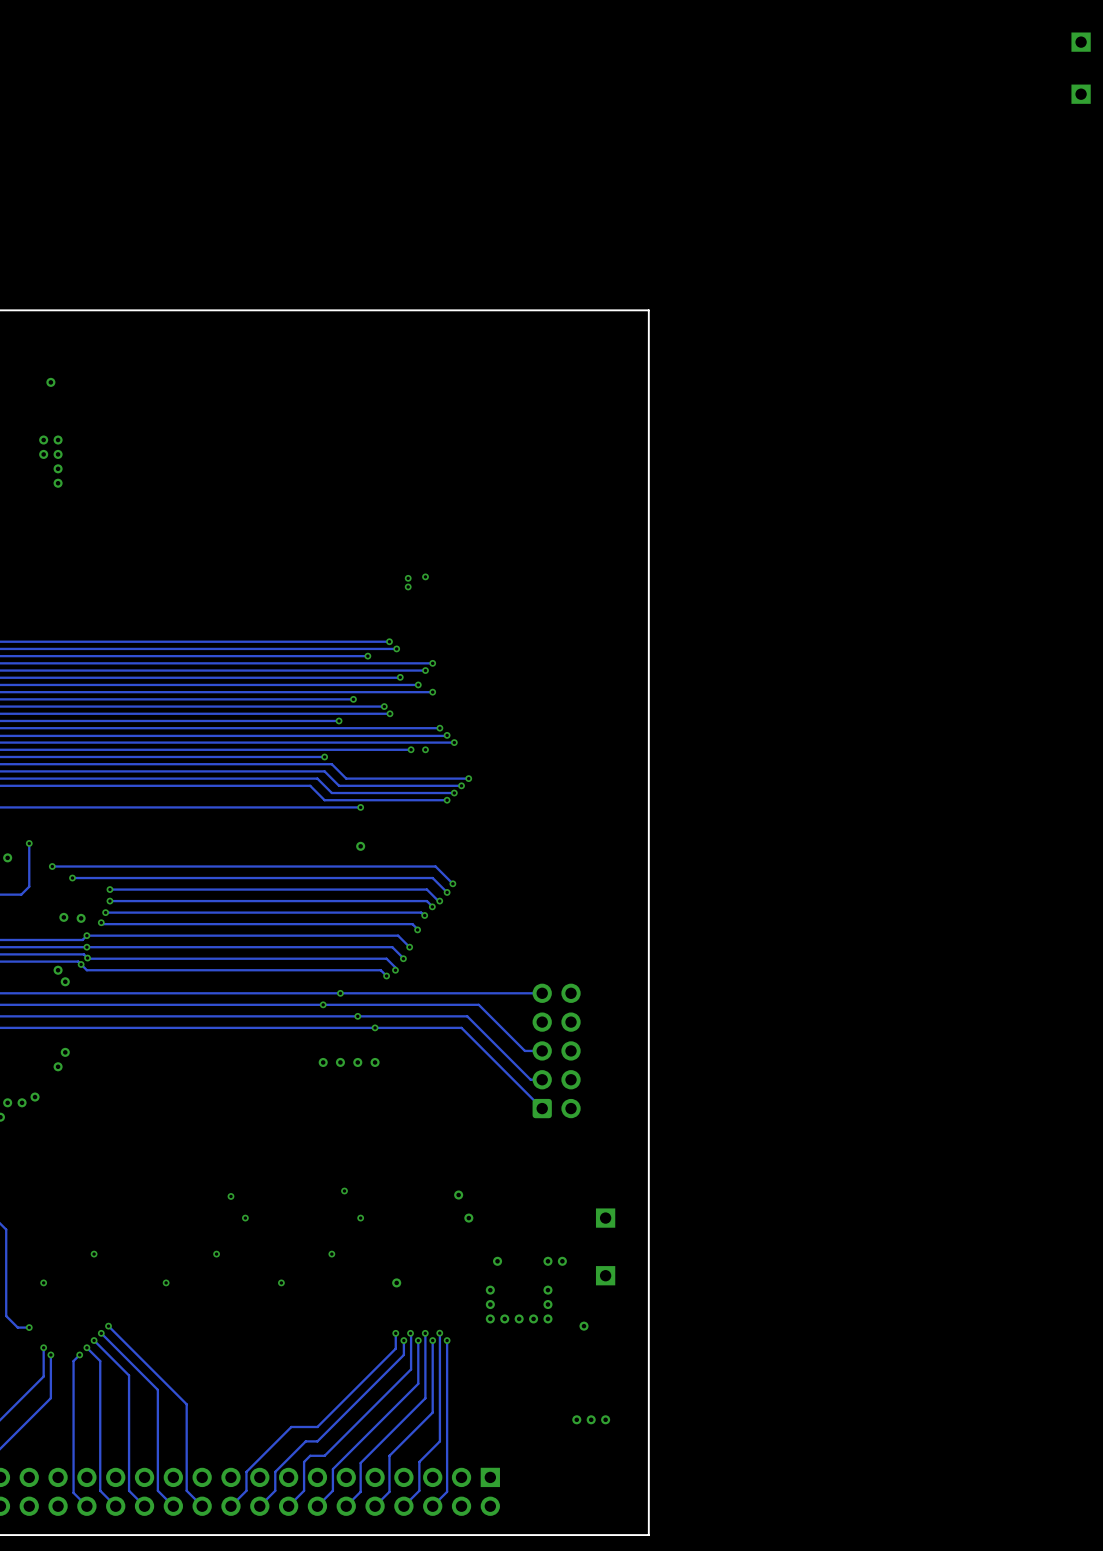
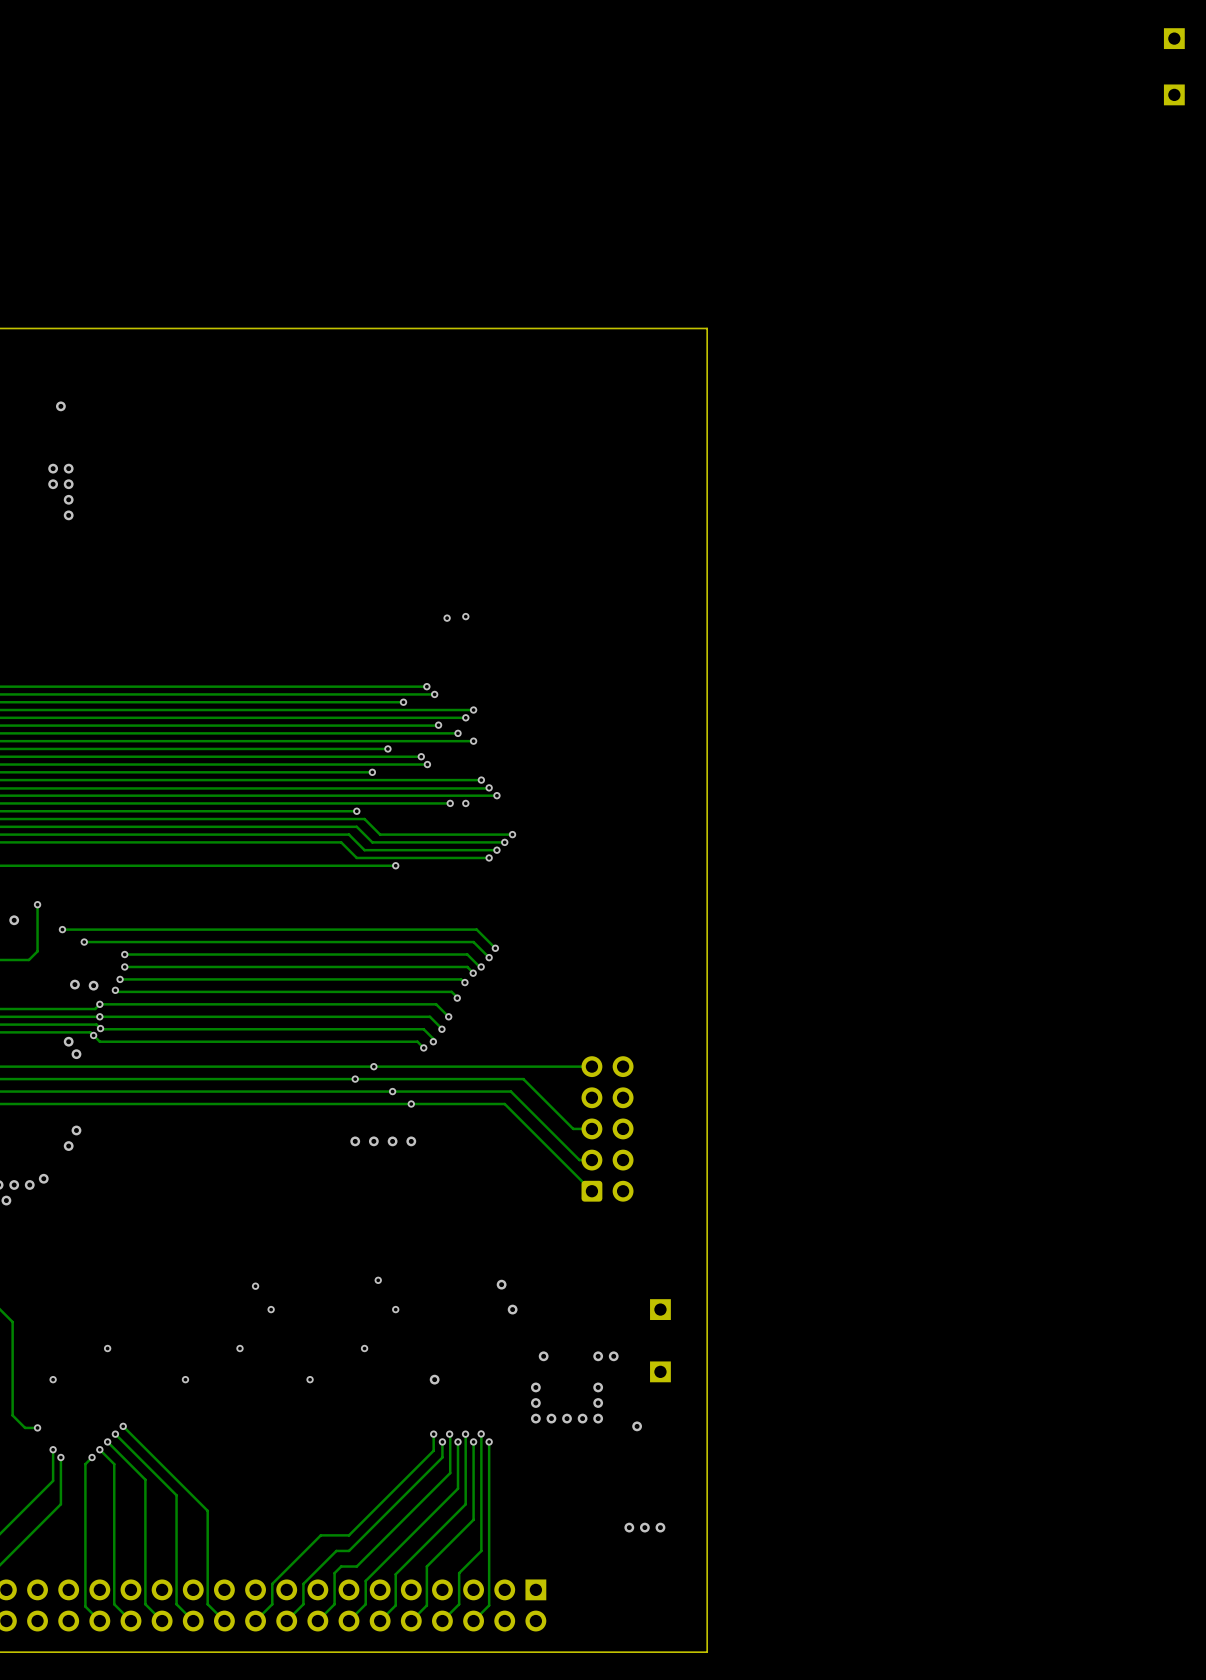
via: (408, 586) -> none
via: (360, 846) -> none

